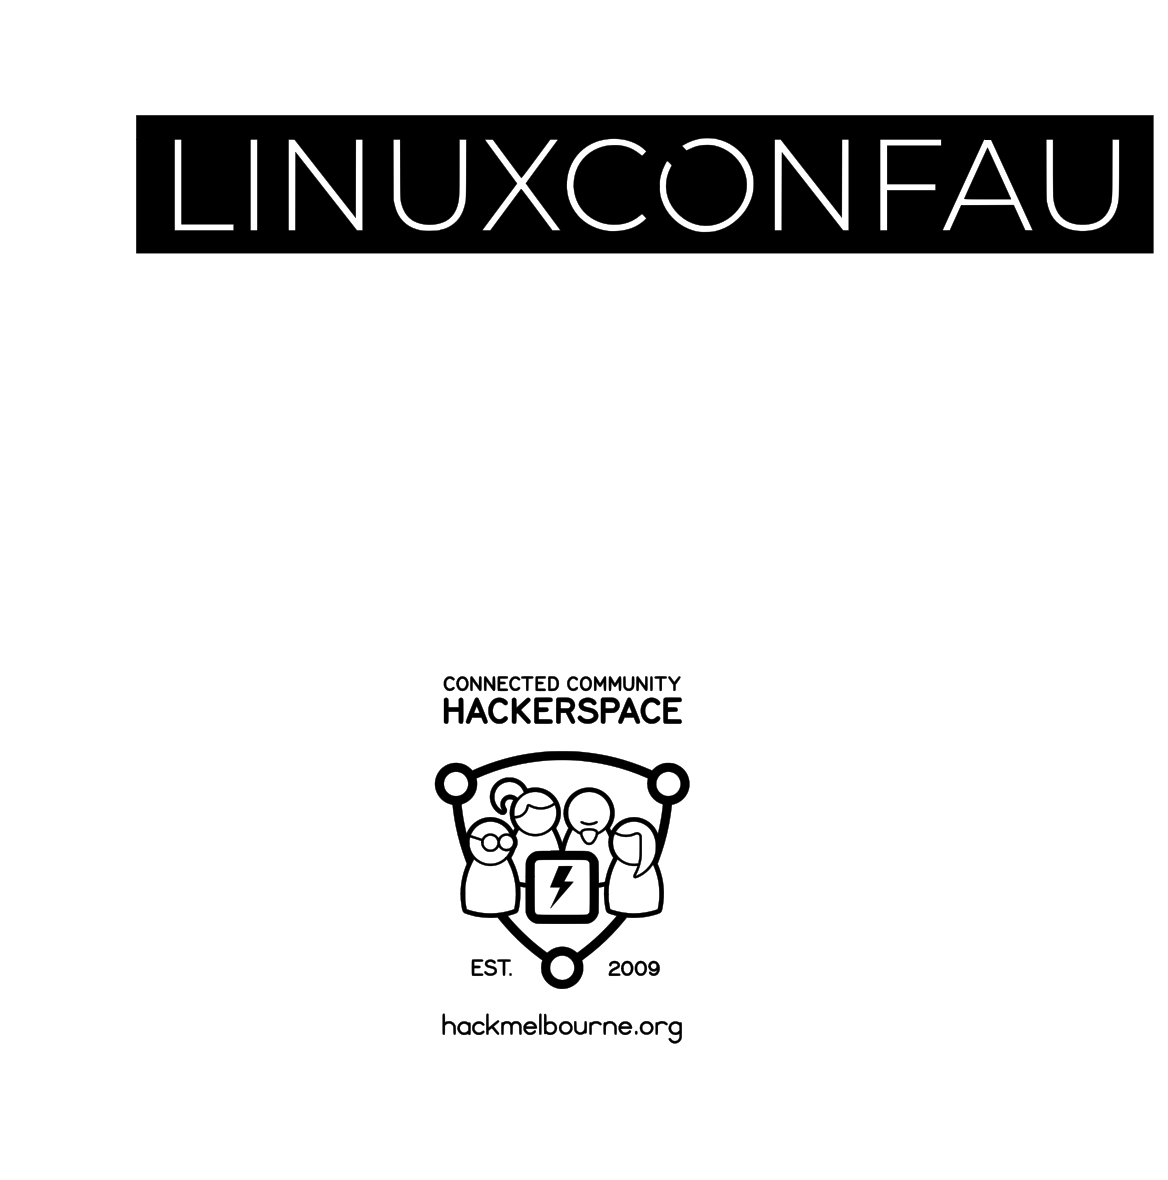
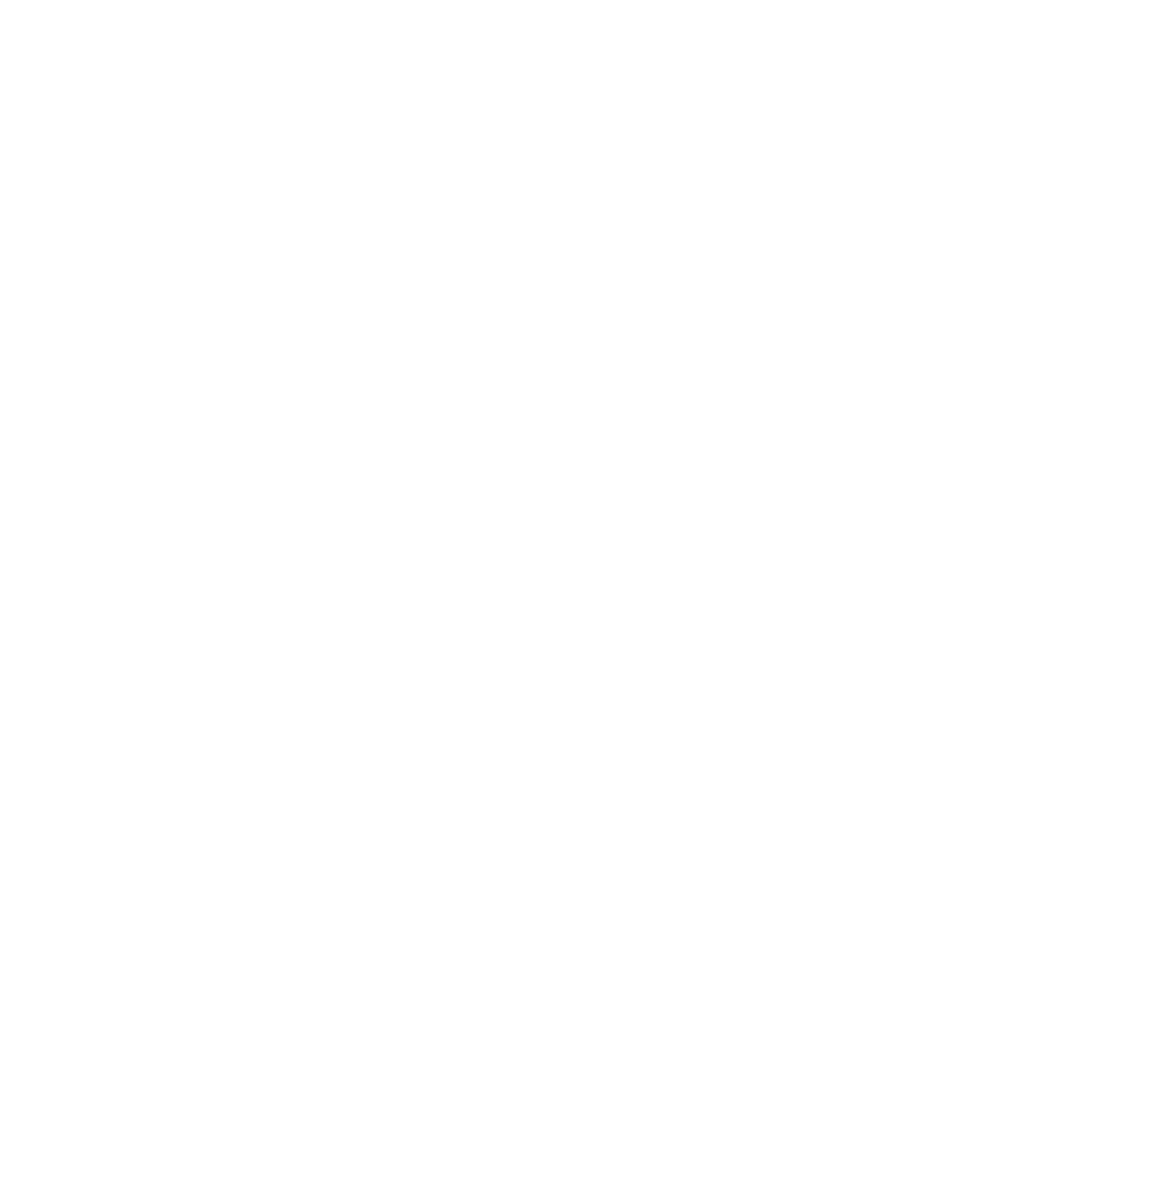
drawing: [136, 115, 1154, 254] -> none
drawing: [434, 676, 690, 1044] -> none

